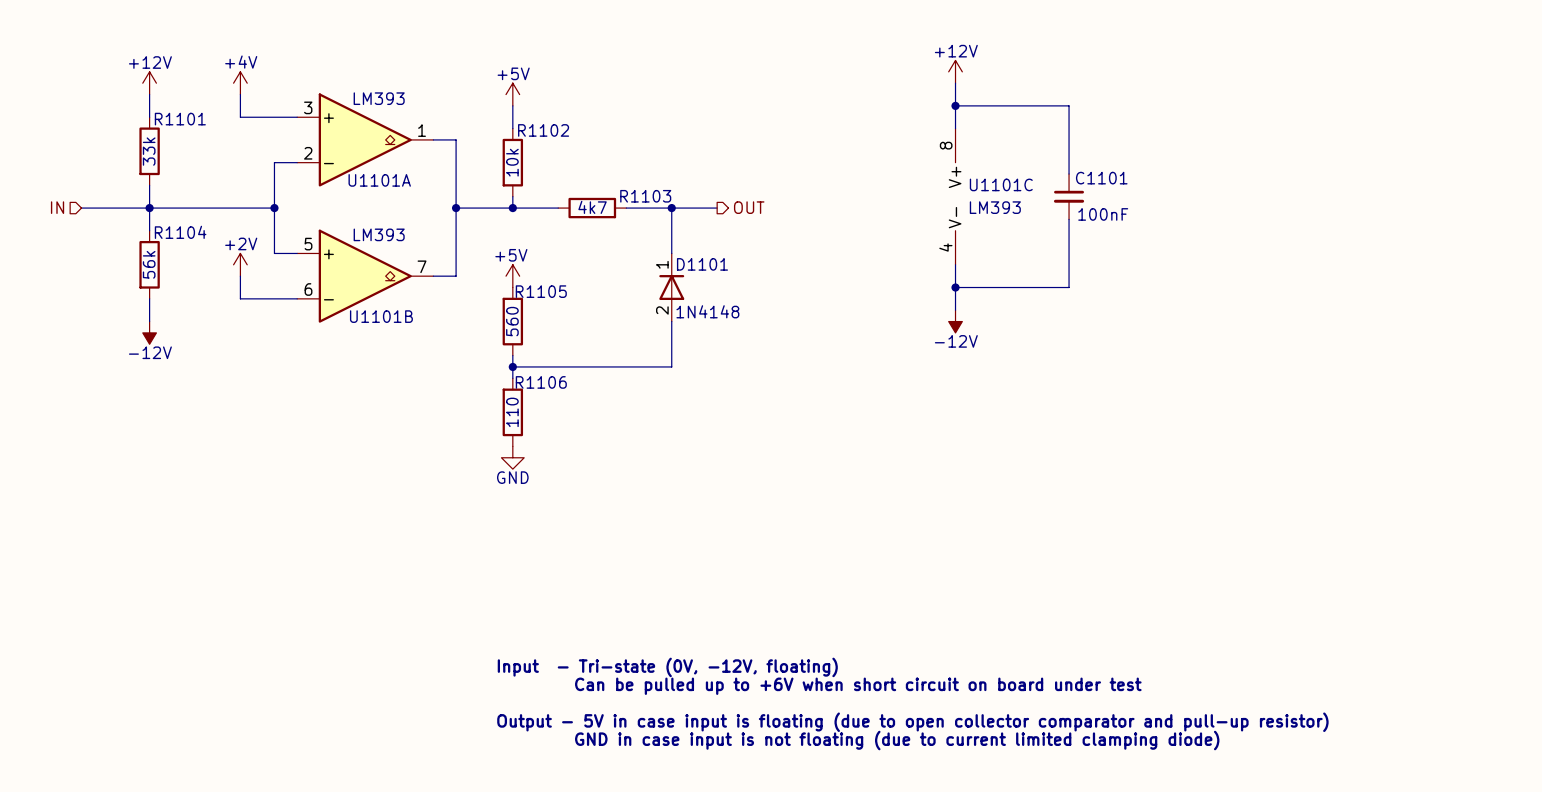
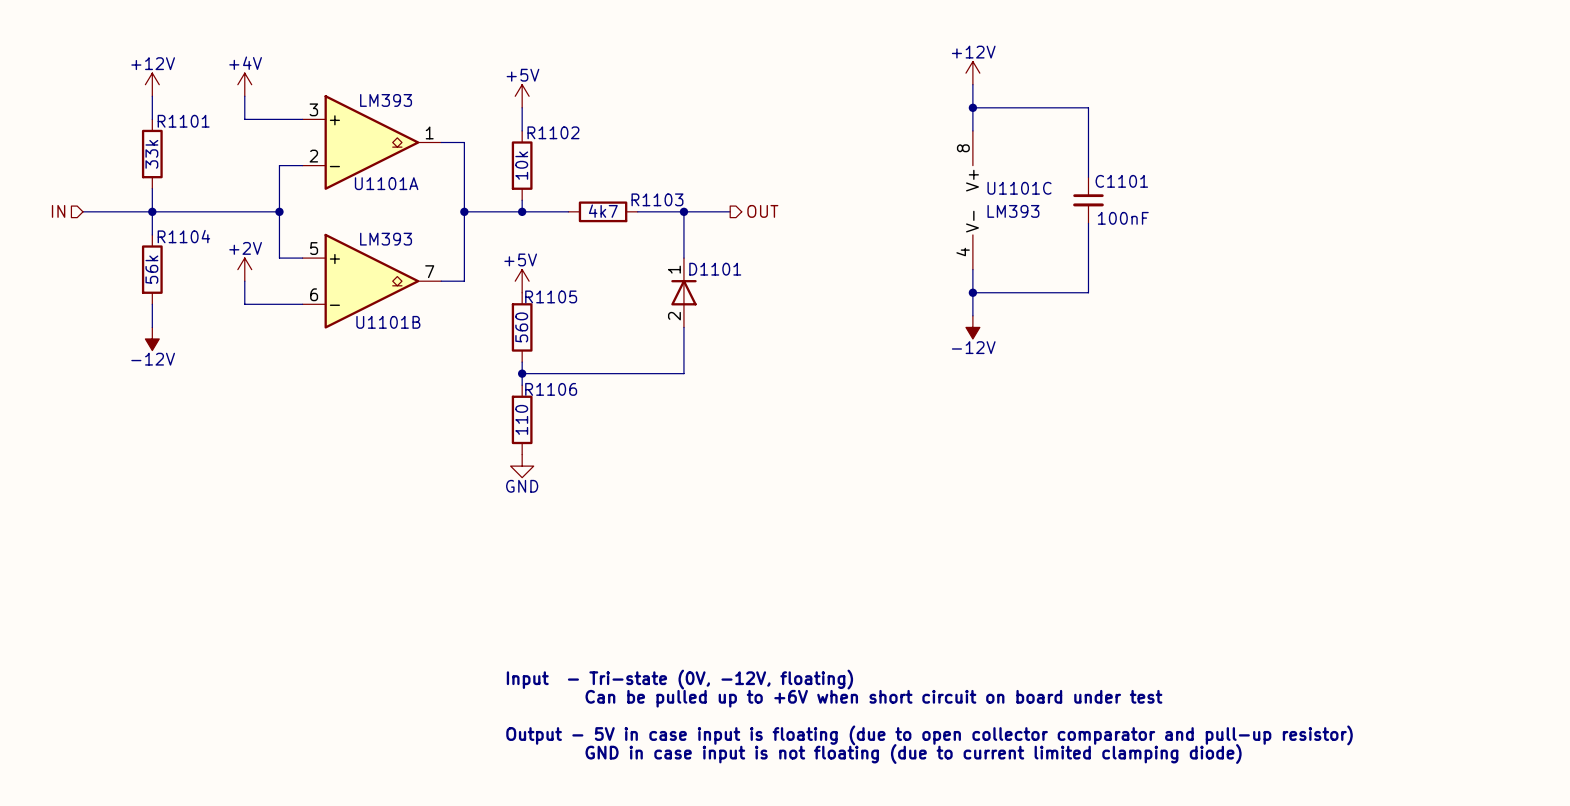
D1101 value: 1N4148 (707, 311) -> none

